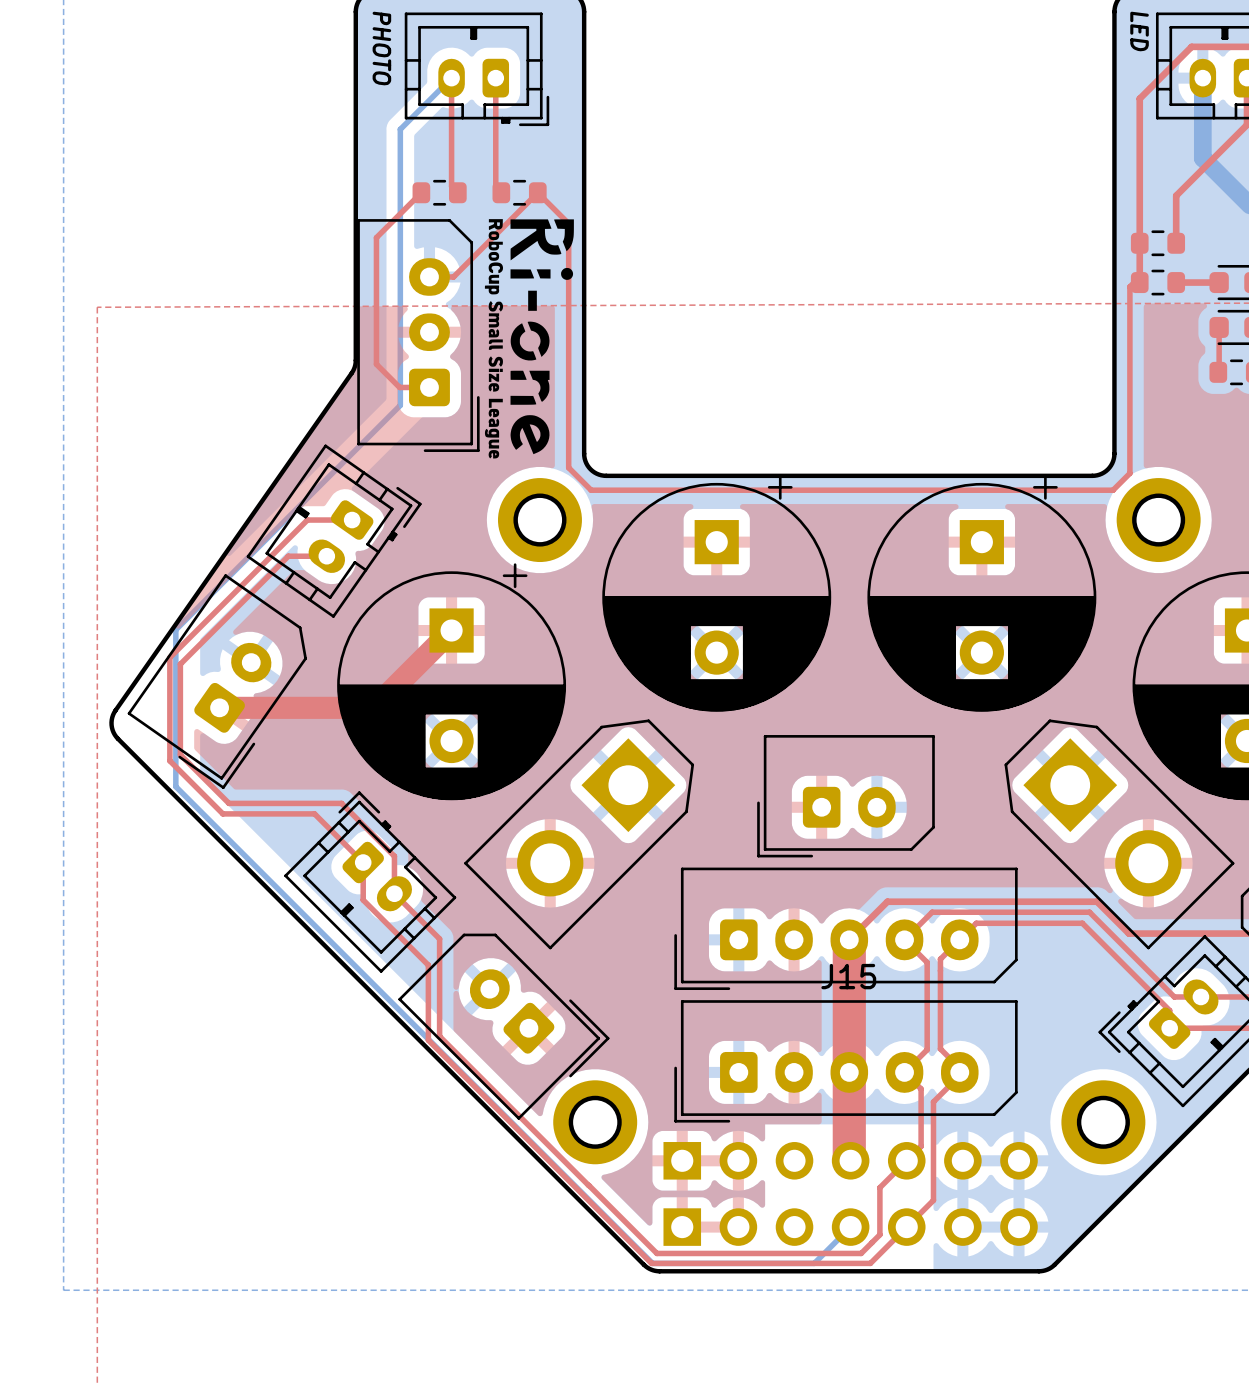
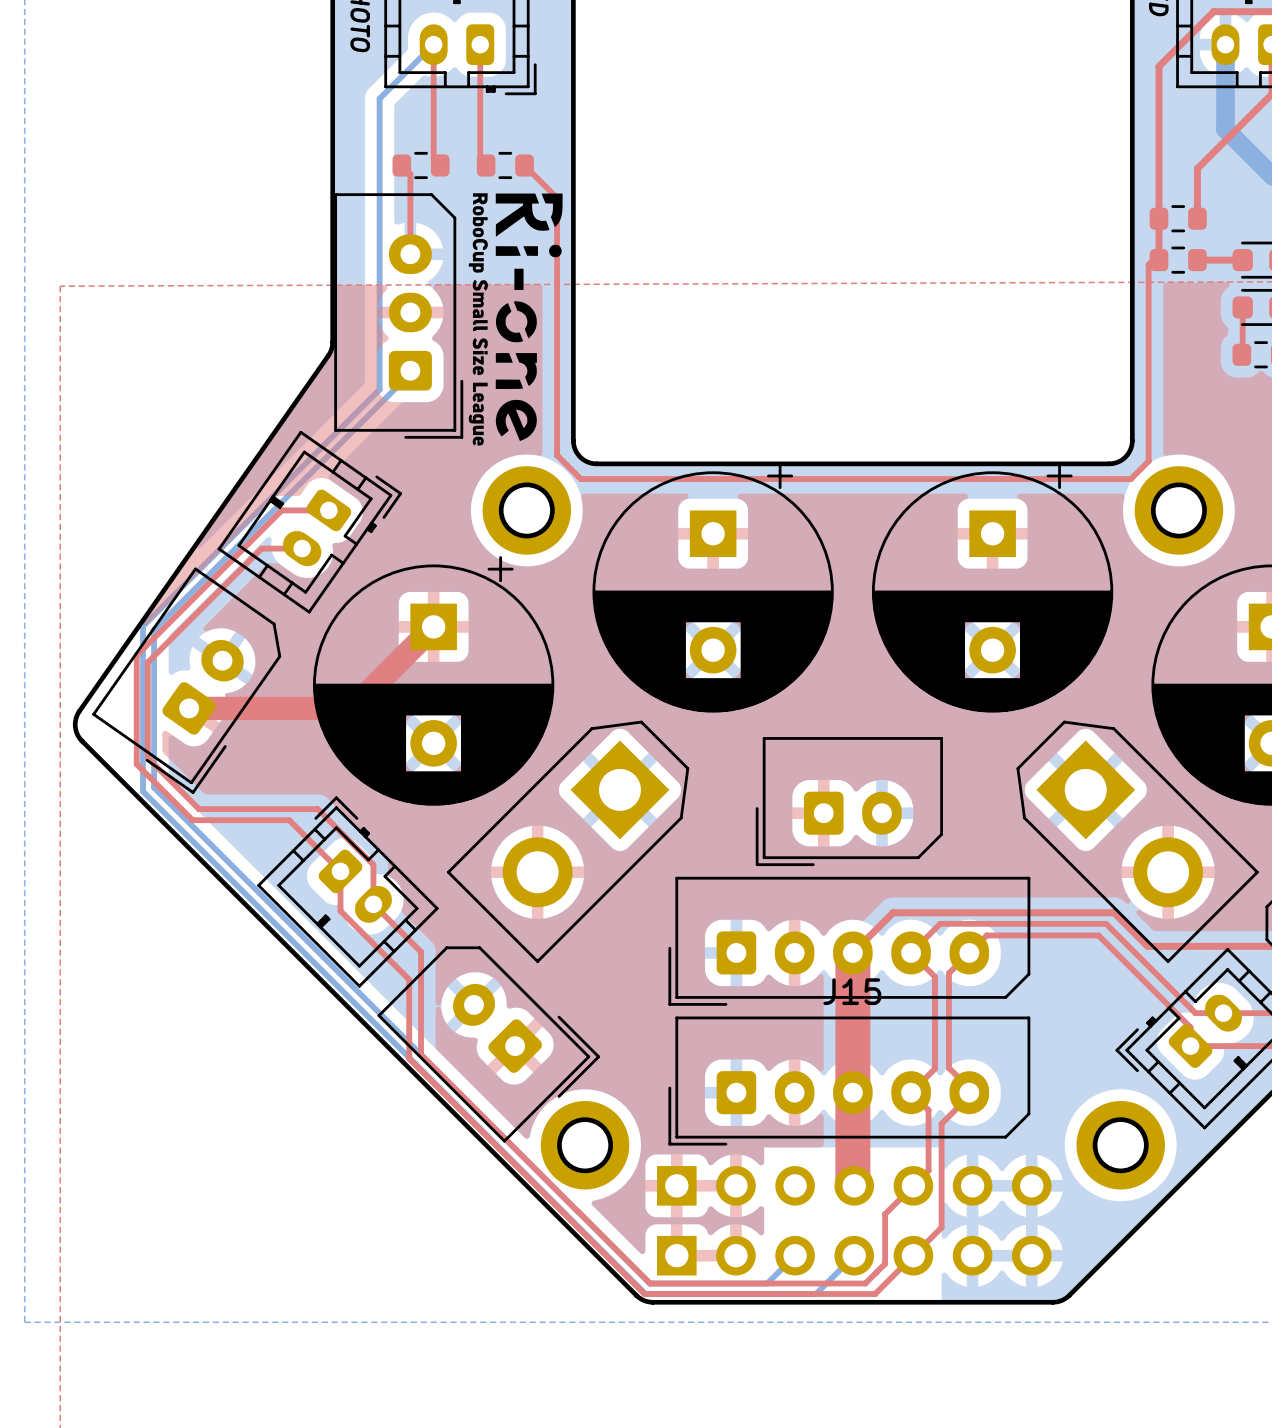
top track: (421, 192) (376, 237) (376, 364) (399, 387) (429, 387) -> (401, 165) (410, 174) (410, 254)
top track: (537, 192) (453, 276) (429, 276) -> none
bottom track: none -> (410, 370) (410, 373) (154, 629) (154, 787) (649, 1283) (767, 1283) (795, 1255)

